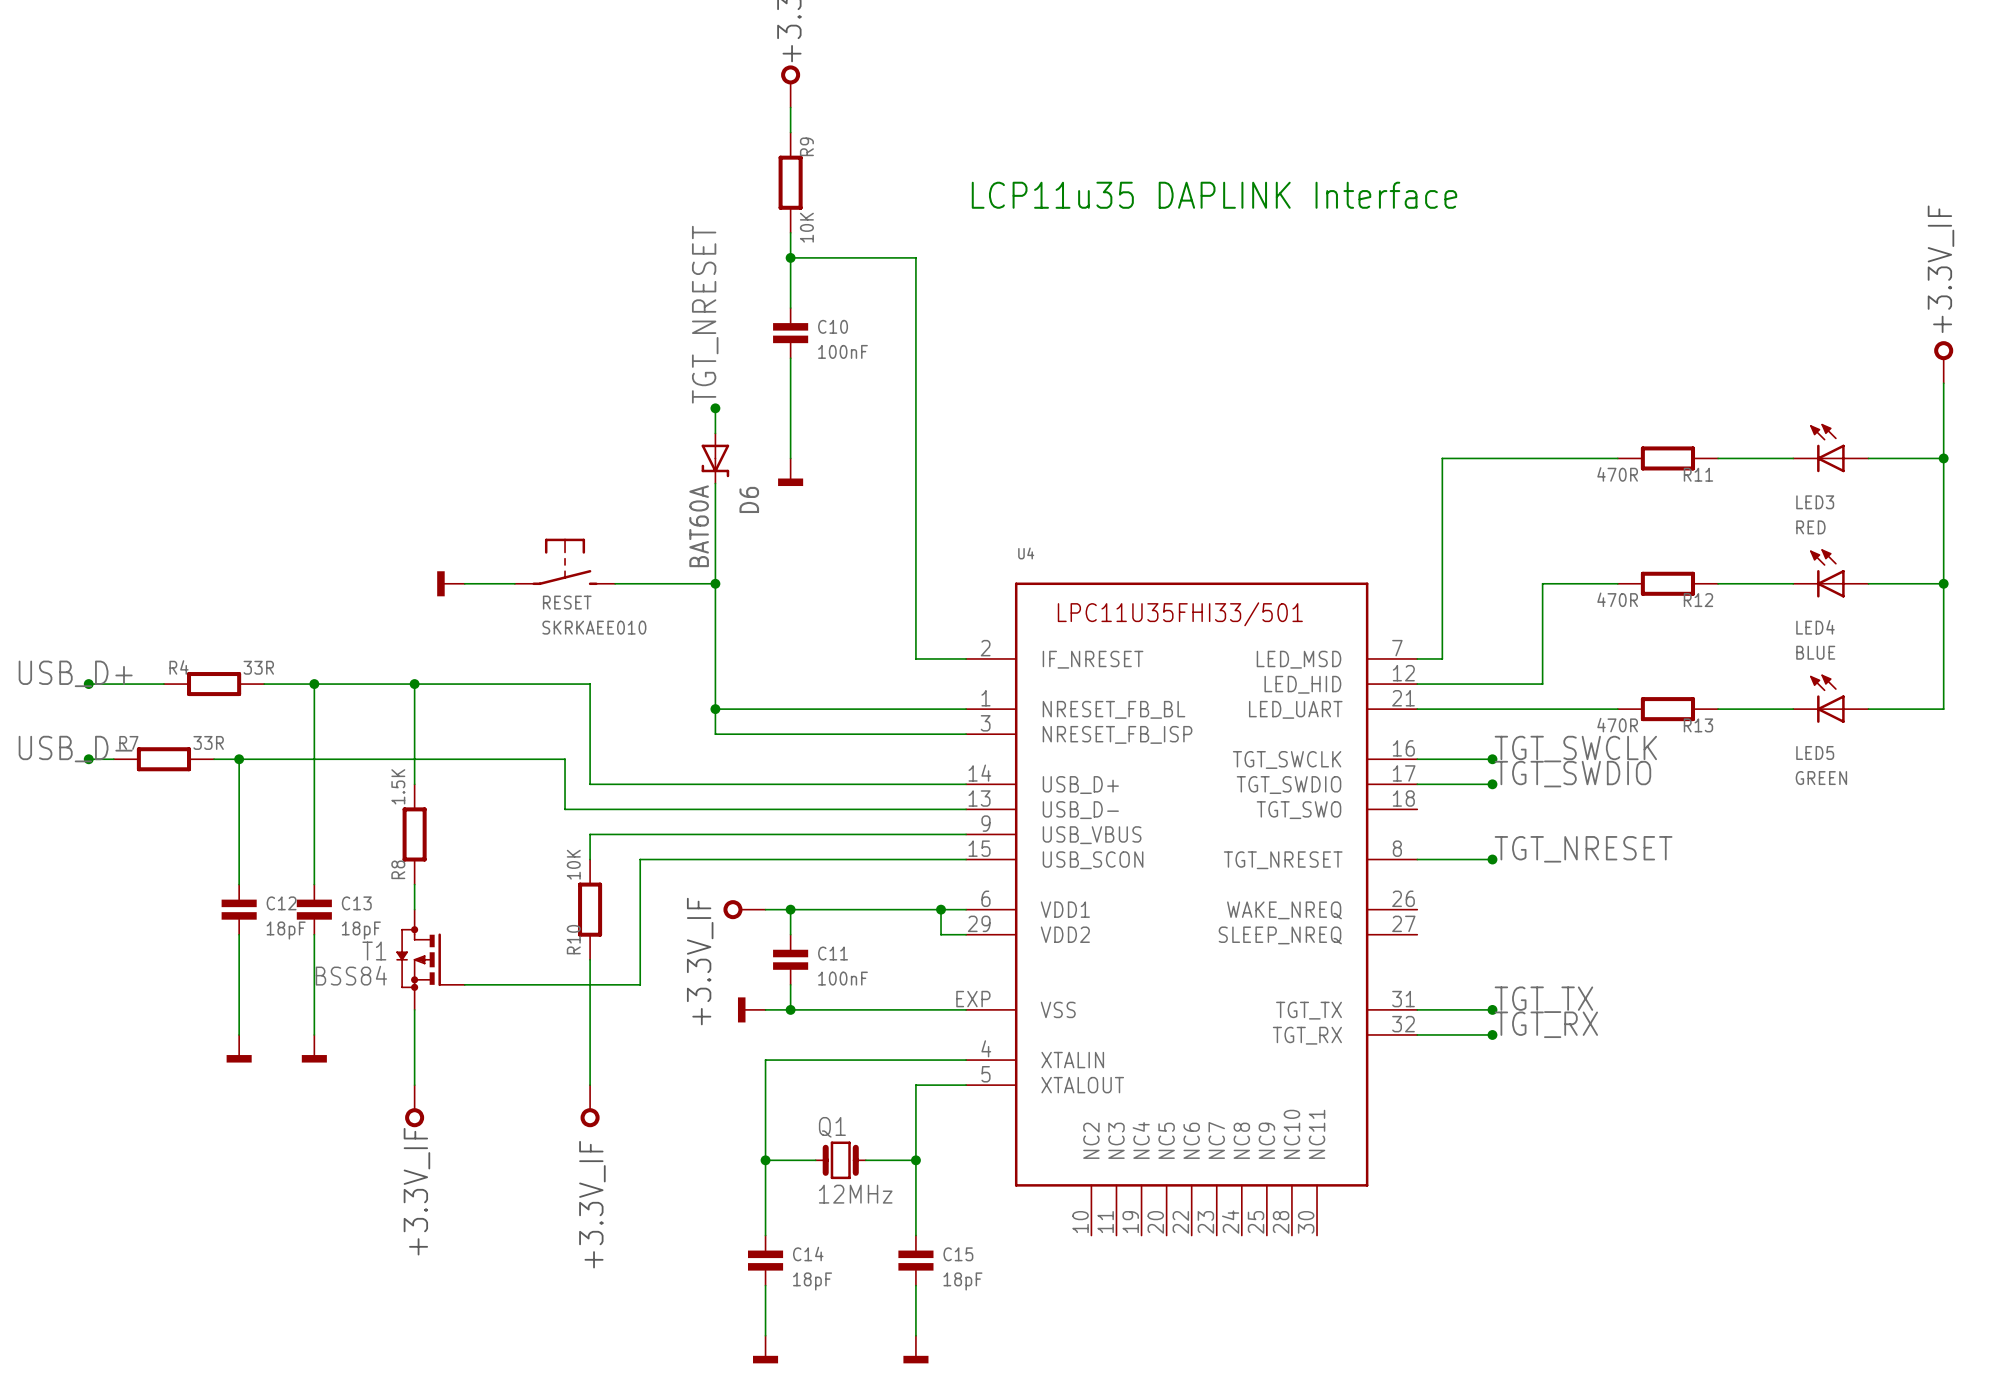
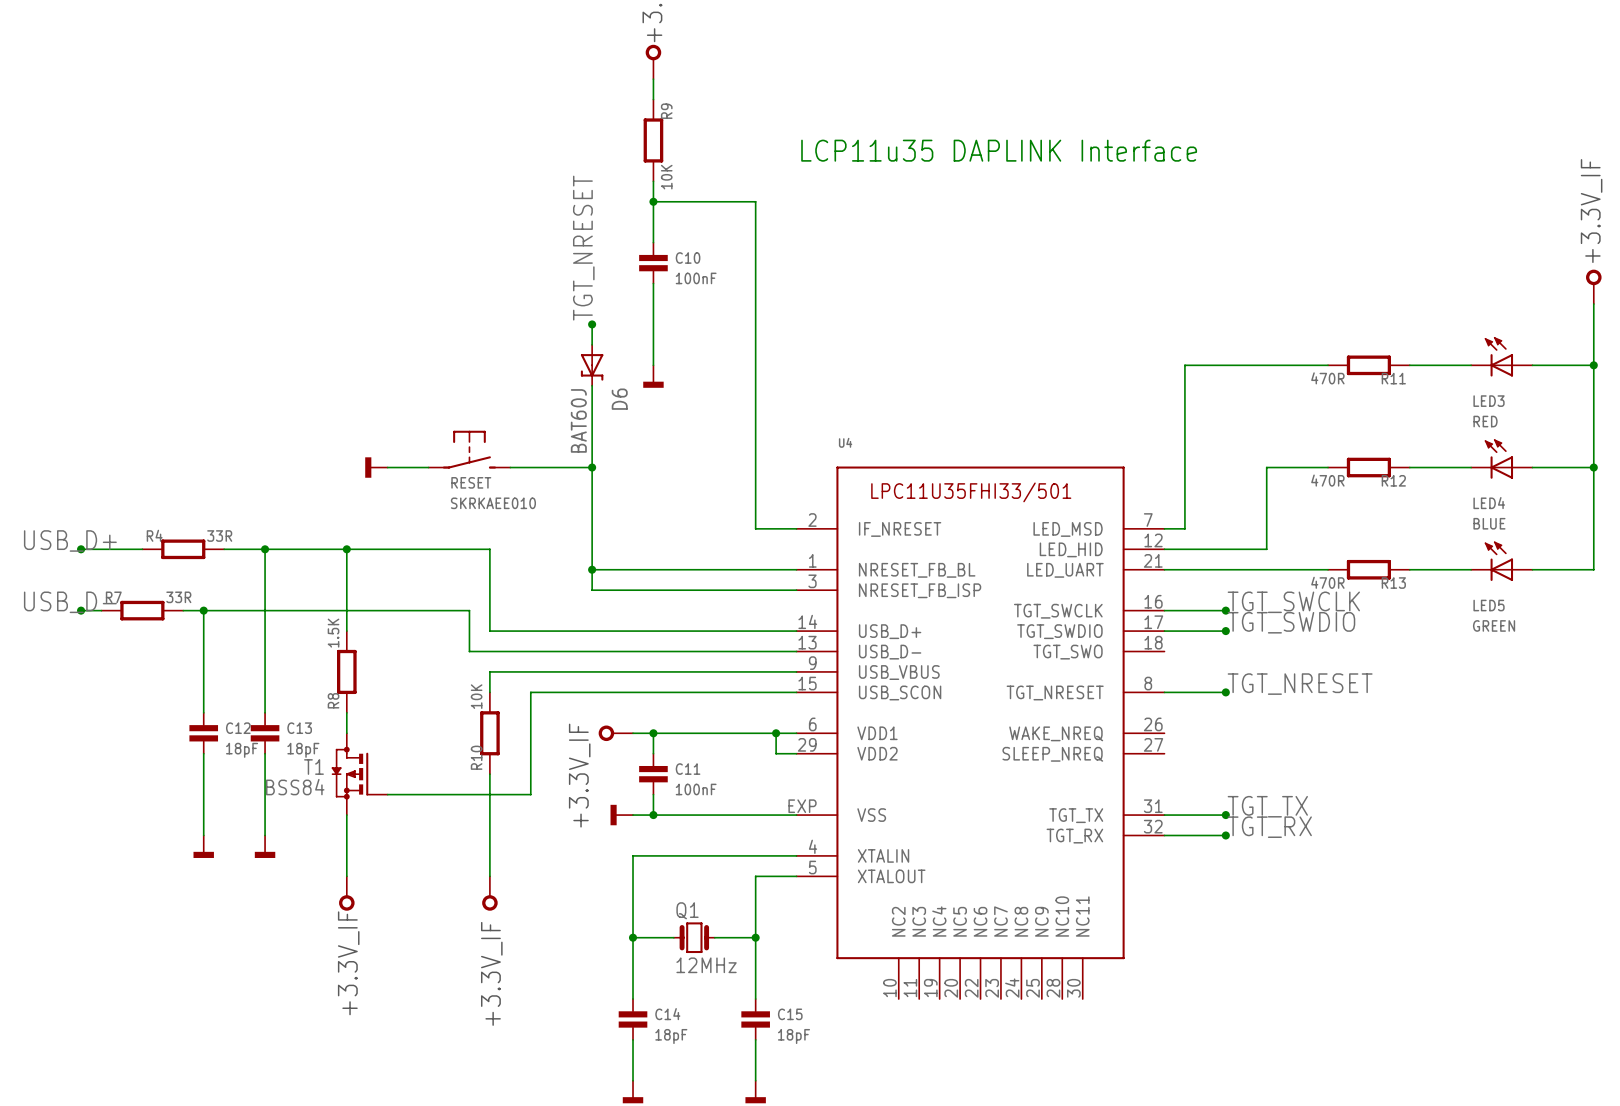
D6 value: BAT60A (699, 526) -> BAT60J (578, 420)

